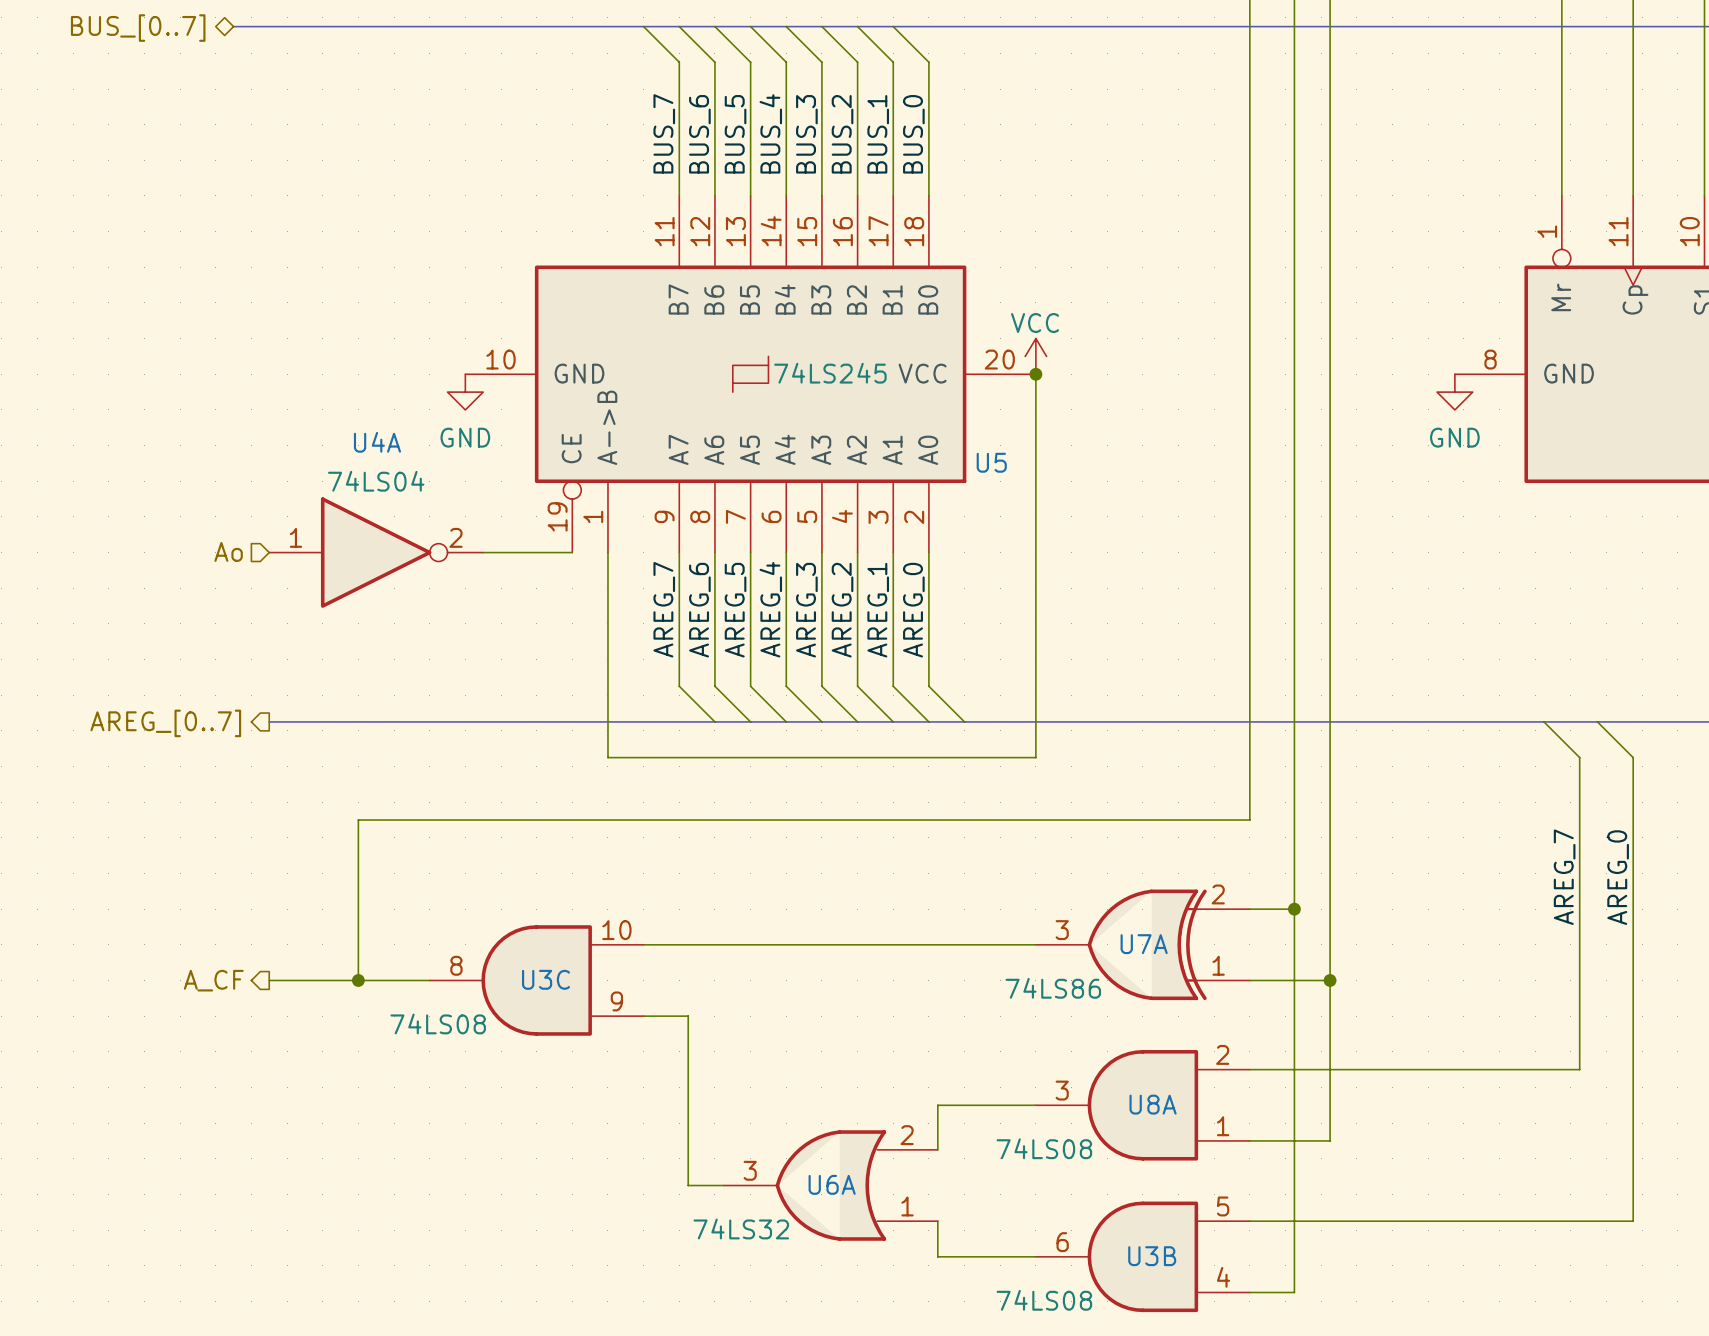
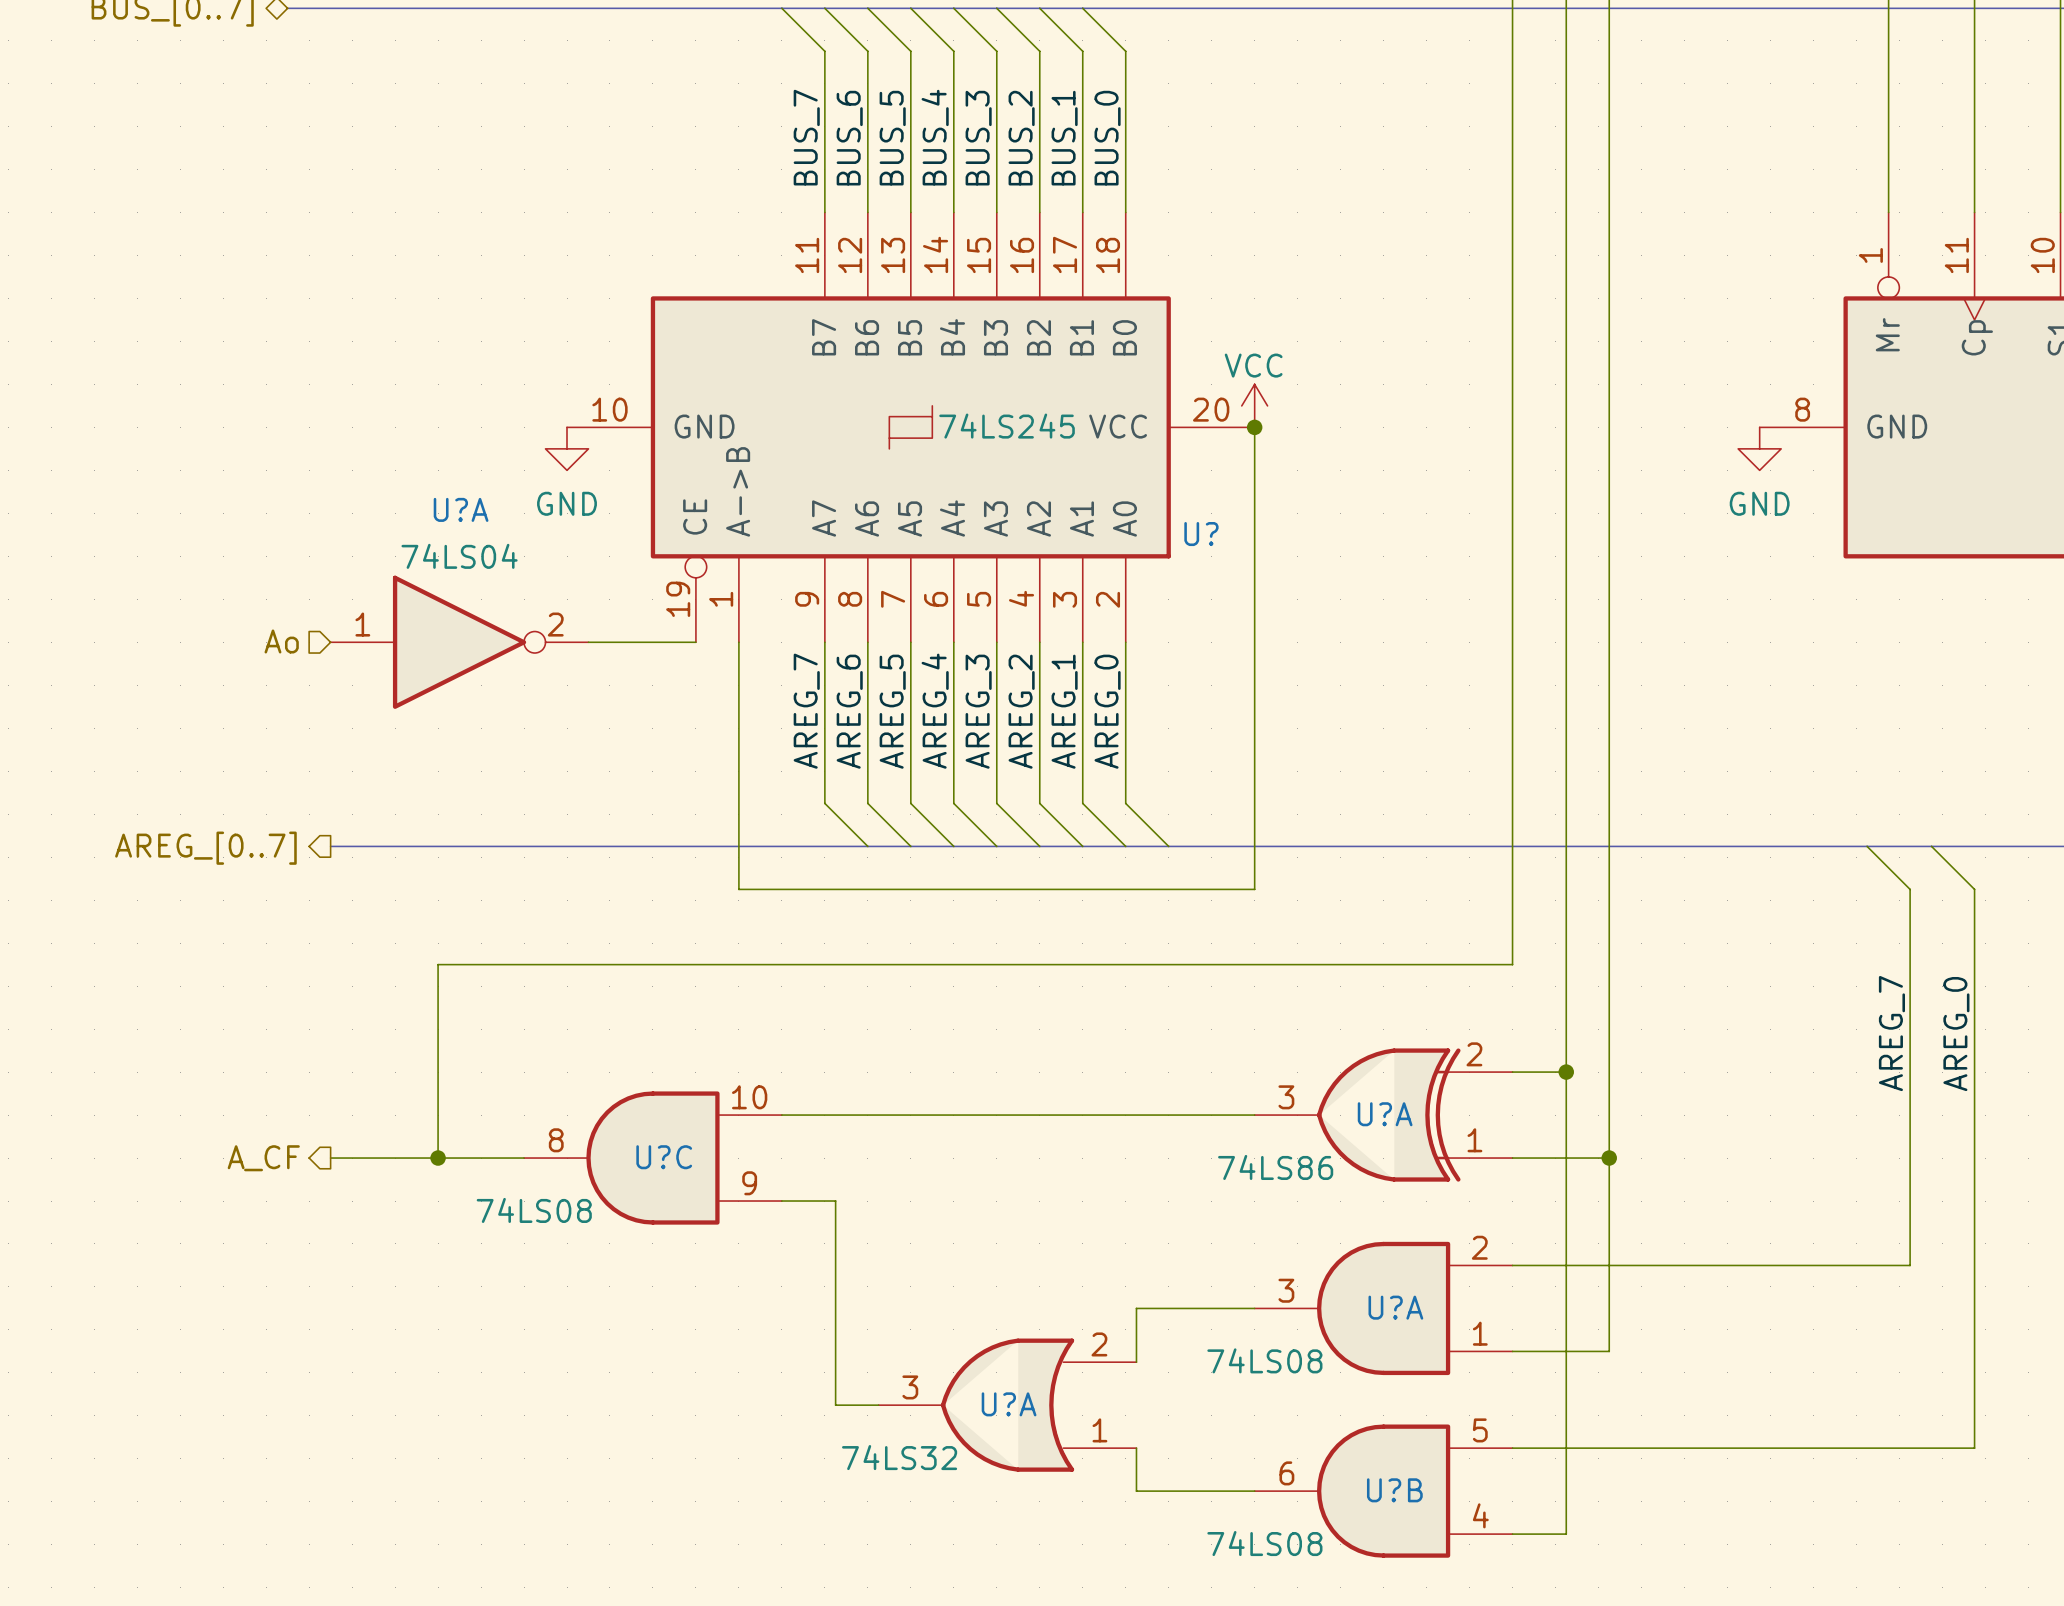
U4A name: U4A (377, 442) -> U?A (461, 509)
U5 name: U5 (991, 462) -> U? (1201, 534)
U7A name: U7A (1144, 944) -> U?A (1385, 1114)
U3C name: U3C (546, 979) -> U?C (664, 1157)
U8A name: U8A (1153, 1104) -> U?A (1395, 1307)
U6A name: U6A (832, 1184) -> U?A (1009, 1404)
U3B name: U3B (1152, 1256) -> U?B (1394, 1490)

